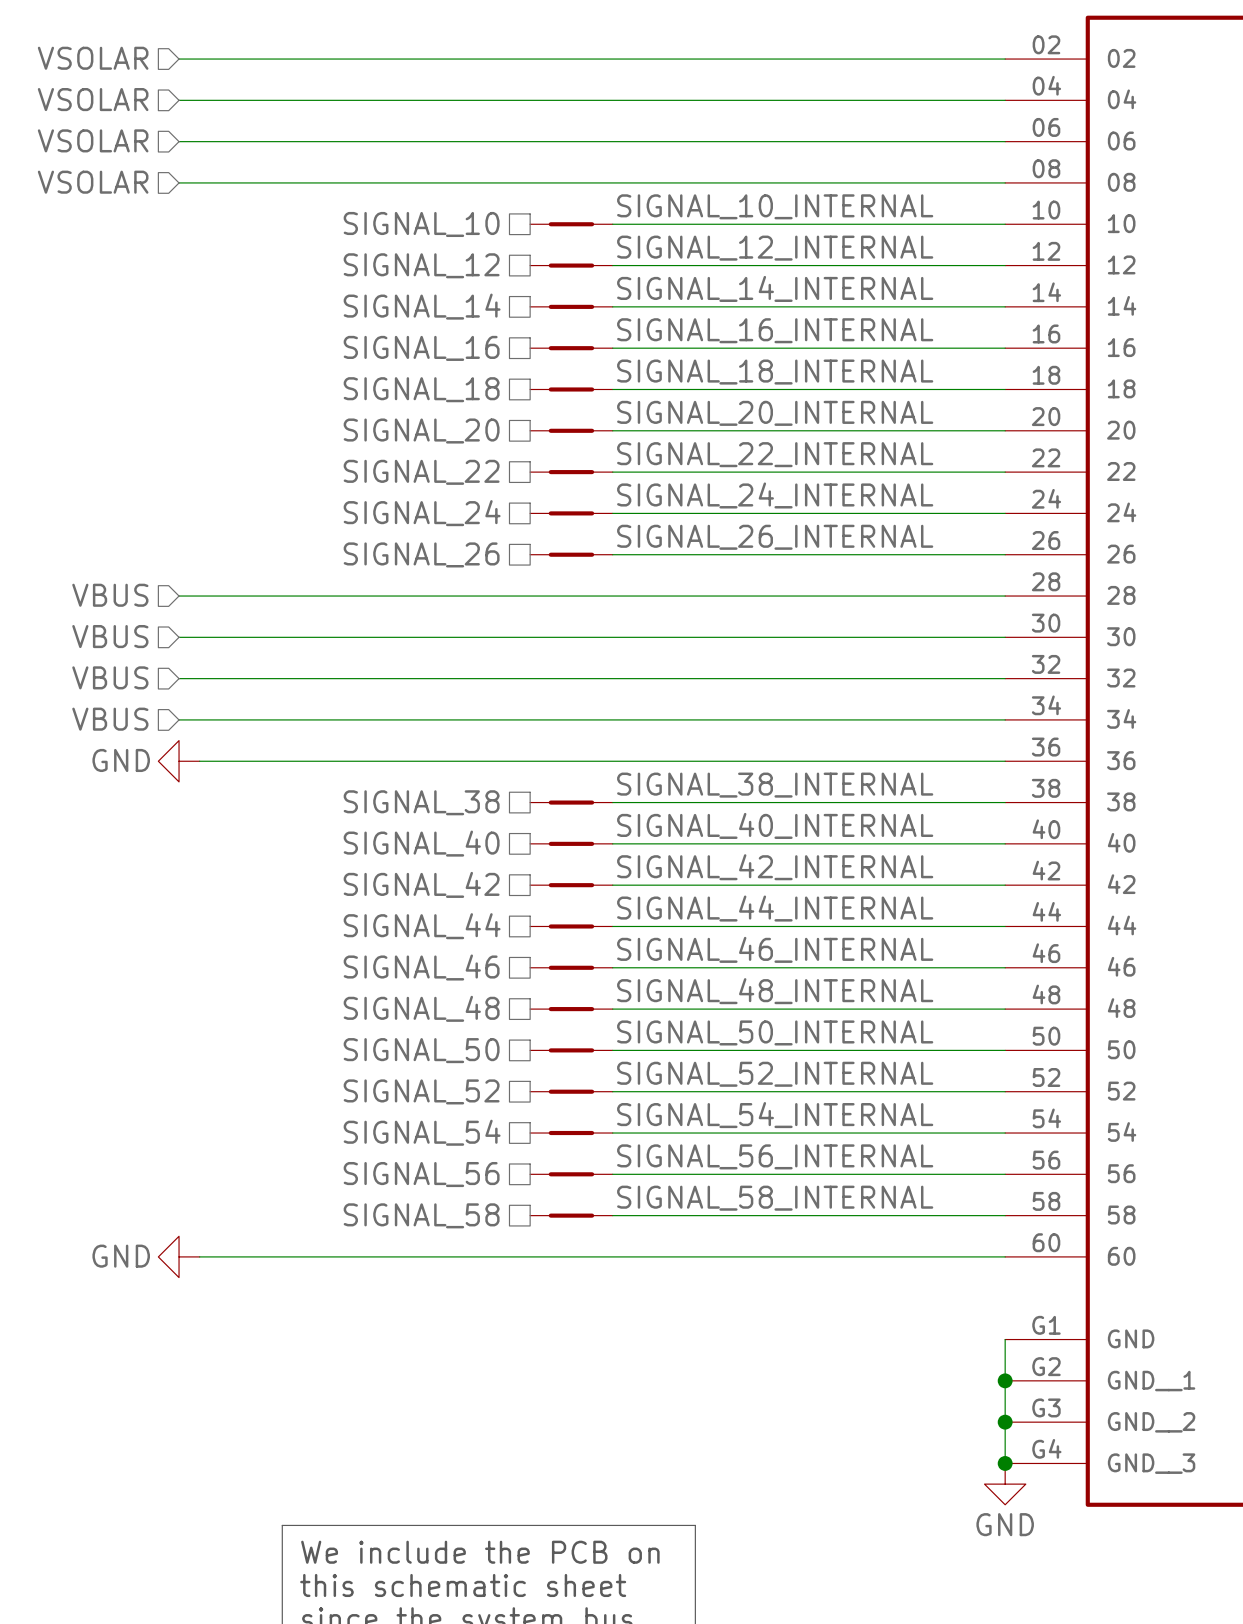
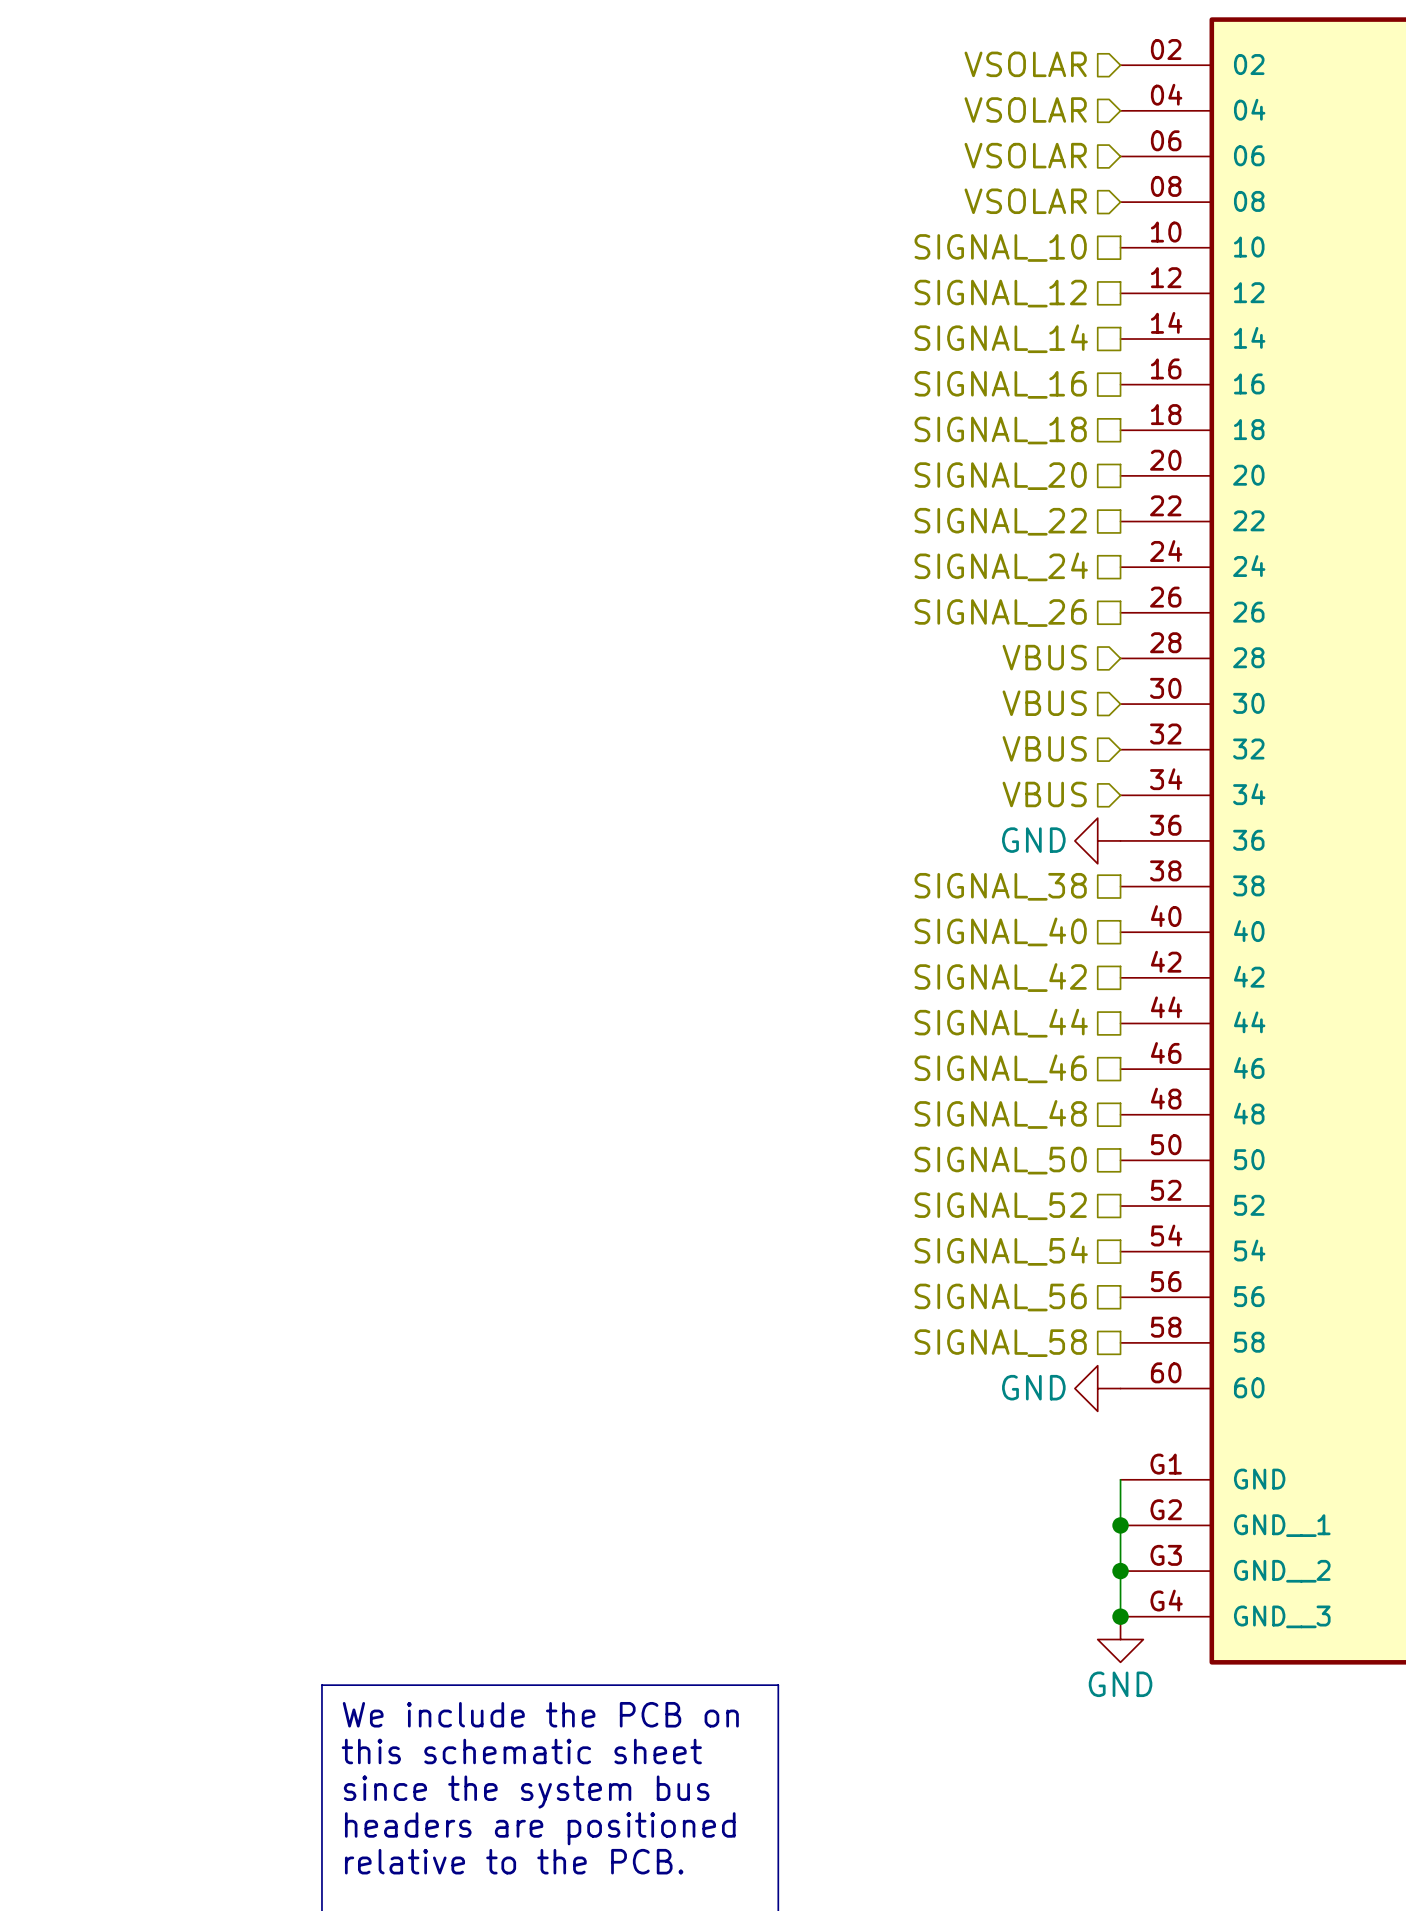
hierarchical label: VSOLAR (93, 58) -> none
hierarchical label: none -> VSOLAR (1025, 64)
wire: (179, 59) (1005, 59) -> none
hierarchical label: VSOLAR (93, 99) -> none
hierarchical label: none -> VSOLAR (1025, 109)
wire: (179, 100) (1005, 100) -> none
hierarchical label: VSOLAR (93, 140) -> none
hierarchical label: none -> VSOLAR (1025, 155)
wire: (179, 141) (1005, 141) -> none
hierarchical label: VSOLAR (93, 182) -> none
wire: (179, 182) (1005, 182) -> none
hierarchical label: none -> VSOLAR (1025, 201)
label: SIGNAL_10_INTERNAL (775, 206) -> none
hierarchical label: SIGNAL_10 (421, 224) -> none
part: (571, 224) -> none
wire: (612, 224) (1005, 224) -> none
hierarchical label: none -> SIGNAL_10 (1000, 247)
label: SIGNAL_12_INTERNAL (775, 248) -> none
hierarchical label: SIGNAL_12 (421, 265) -> none
part: (571, 265) -> none
wire: (612, 265) (1005, 265) -> none
hierarchical label: none -> SIGNAL_12 (1000, 293)
label: SIGNAL_14_INTERNAL (775, 288) -> none
hierarchical label: SIGNAL_14 (422, 306) -> none
part: (571, 306) -> none
wire: (612, 306) (1005, 306) -> none
hierarchical label: none -> SIGNAL_14 (1001, 338)
label: SIGNAL_16_INTERNAL (775, 330) -> none
hierarchical label: SIGNAL_16 (421, 348) -> none
part: (571, 348) -> none
wire: (612, 348) (1005, 348) -> none
hierarchical label: none -> SIGNAL_16 (1000, 384)
label: SIGNAL_18_INTERNAL (775, 372) -> none
hierarchical label: SIGNAL_18 (421, 389) -> none
part: (571, 389) -> none
wire: (612, 389) (1005, 389) -> none
hierarchical label: none -> SIGNAL_18 (1000, 430)
label: SIGNAL_20_INTERNAL (775, 413) -> none
part: (571, 430) -> none
wire: (612, 430) (1005, 430) -> none
hierarchical label: SIGNAL_20 (421, 431) -> none
hierarchical label: none -> SIGNAL_20 (1000, 476)
label: SIGNAL_22_INTERNAL (775, 454) -> none
hierarchical label: SIGNAL_22 (421, 472) -> none
part: (571, 472) -> none
wire: (612, 472) (1005, 472) -> none
hierarchical label: none -> SIGNAL_22 (1000, 521)
label: SIGNAL_24_INTERNAL (775, 495) -> none
hierarchical label: SIGNAL_24 (422, 513) -> none
part: (571, 513) -> none
wire: (612, 513) (1005, 513) -> none
hierarchical label: none -> SIGNAL_24 (1001, 566)
label: SIGNAL_26_INTERNAL (775, 537) -> none
hierarchical label: SIGNAL_26 (421, 554) -> none
part: (571, 554) -> none
wire: (612, 554) (1005, 554) -> none
hierarchical label: none -> SIGNAL_26 (1000, 613)
hierarchical label: VBUS (110, 595) -> none
hierarchical label: none -> VBUS (1044, 657)
wire: (179, 596) (1005, 596) -> none
hierarchical label: VBUS (110, 636) -> none
hierarchical label: none -> VBUS (1044, 703)
wire: (179, 637) (1005, 637) -> none
hierarchical label: VBUS (110, 677) -> none
hierarchical label: none -> VBUS (1044, 748)
wire: (179, 678) (1005, 678) -> none
hierarchical label: VBUS (110, 719) -> none
wire: (179, 719) (1005, 719) -> none
hierarchical label: none -> VBUS (1044, 794)
power symbol: GND (179, 761) -> none
wire: (199, 761) (1005, 761) -> none
power symbol: none -> GND (1097, 840)
label: SIGNAL_38_INTERNAL (775, 785) -> none
hierarchical label: SIGNAL_38 (421, 802) -> none
part: (571, 802) -> none
wire: (612, 802) (1005, 802) -> none
hierarchical label: none -> SIGNAL_38 (1000, 886)
label: SIGNAL_40_INTERNAL (775, 825) -> none
hierarchical label: SIGNAL_40 (421, 843) -> none
part: (571, 843) -> none
wire: (612, 843) (1005, 843) -> none
hierarchical label: none -> SIGNAL_40 (1000, 931)
label: SIGNAL_42_INTERNAL (775, 867) -> none
hierarchical label: SIGNAL_42 (421, 884) -> none
hierarchical label: none -> SIGNAL_42 (1000, 977)
part: (571, 885) -> none
wire: (612, 885) (1005, 885) -> none
label: SIGNAL_44_INTERNAL (775, 908) -> none
hierarchical label: SIGNAL_44 (422, 926) -> none
part: (571, 926) -> none
wire: (612, 926) (1005, 926) -> none
hierarchical label: none -> SIGNAL_44 (1001, 1023)
label: SIGNAL_46_INTERNAL (775, 949) -> none
hierarchical label: SIGNAL_46 (421, 967) -> none
part: (571, 967) -> none
wire: (612, 967) (1005, 967) -> none
hierarchical label: none -> SIGNAL_46 (1000, 1068)
label: SIGNAL_48_INTERNAL (775, 991) -> none
hierarchical label: SIGNAL_48 (421, 1008) -> none
hierarchical label: none -> SIGNAL_48 (1000, 1114)
part: (571, 1009) -> none
wire: (612, 1009) (1005, 1009) -> none
label: SIGNAL_50_INTERNAL (775, 1032) -> none
hierarchical label: SIGNAL_50 (421, 1050) -> none
part: (571, 1050) -> none
wire: (612, 1050) (1005, 1050) -> none
hierarchical label: none -> SIGNAL_50 (1000, 1160)
label: SIGNAL_52_INTERNAL (775, 1074) -> none
hierarchical label: SIGNAL_52 (421, 1091) -> none
part: (571, 1091) -> none
wire: (612, 1091) (1005, 1091) -> none
hierarchical label: none -> SIGNAL_52 (1000, 1206)
label: SIGNAL_54_INTERNAL (775, 1115) -> none
hierarchical label: SIGNAL_54 (422, 1132) -> none
hierarchical label: none -> SIGNAL_54 (1001, 1251)
part: (571, 1133) -> none
wire: (612, 1133) (1005, 1133) -> none
label: SIGNAL_56_INTERNAL (775, 1156) -> none
hierarchical label: SIGNAL_56 (421, 1174) -> none
part: (571, 1174) -> none
wire: (612, 1174) (1005, 1174) -> none
hierarchical label: none -> SIGNAL_56 (1000, 1297)
label: SIGNAL_58_INTERNAL (775, 1198) -> none
hierarchical label: SIGNAL_58 (421, 1215) -> none
part: (571, 1215) -> none
wire: (612, 1215) (1005, 1215) -> none
hierarchical label: none -> SIGNAL_58 (1000, 1343)
power symbol: GND (179, 1256) -> none
wire: (199, 1256) (1005, 1256) -> none
power symbol: none -> GND (1097, 1388)

